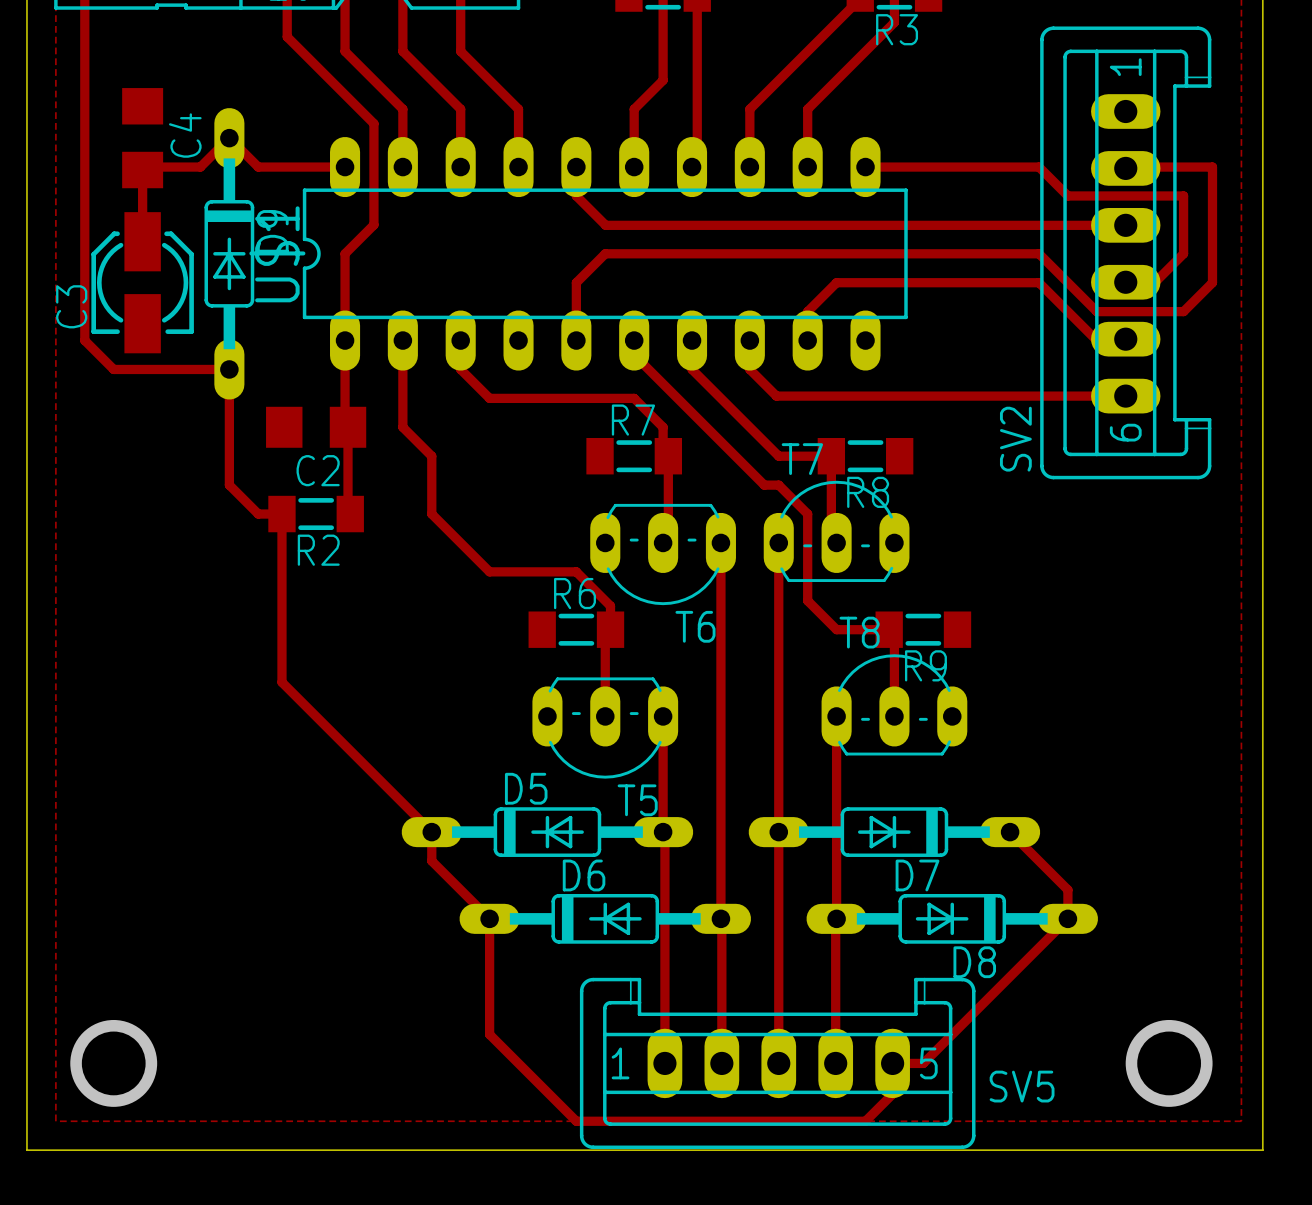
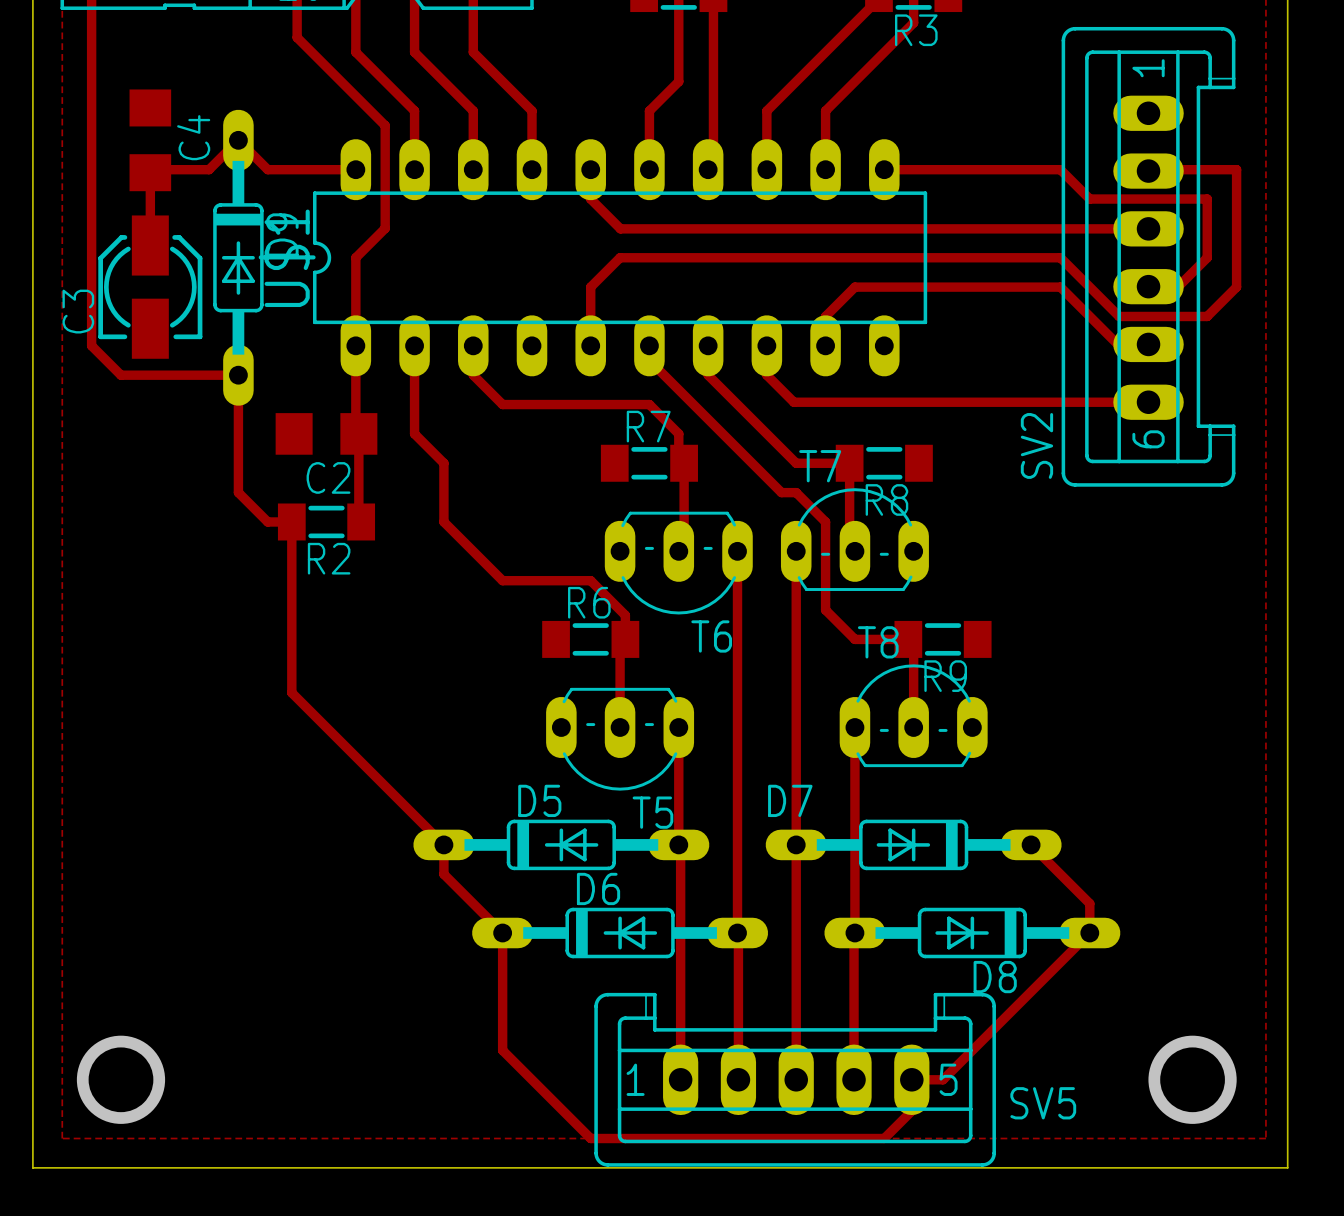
D7 name position: D7 (917, 875) -> D7 (790, 800)

